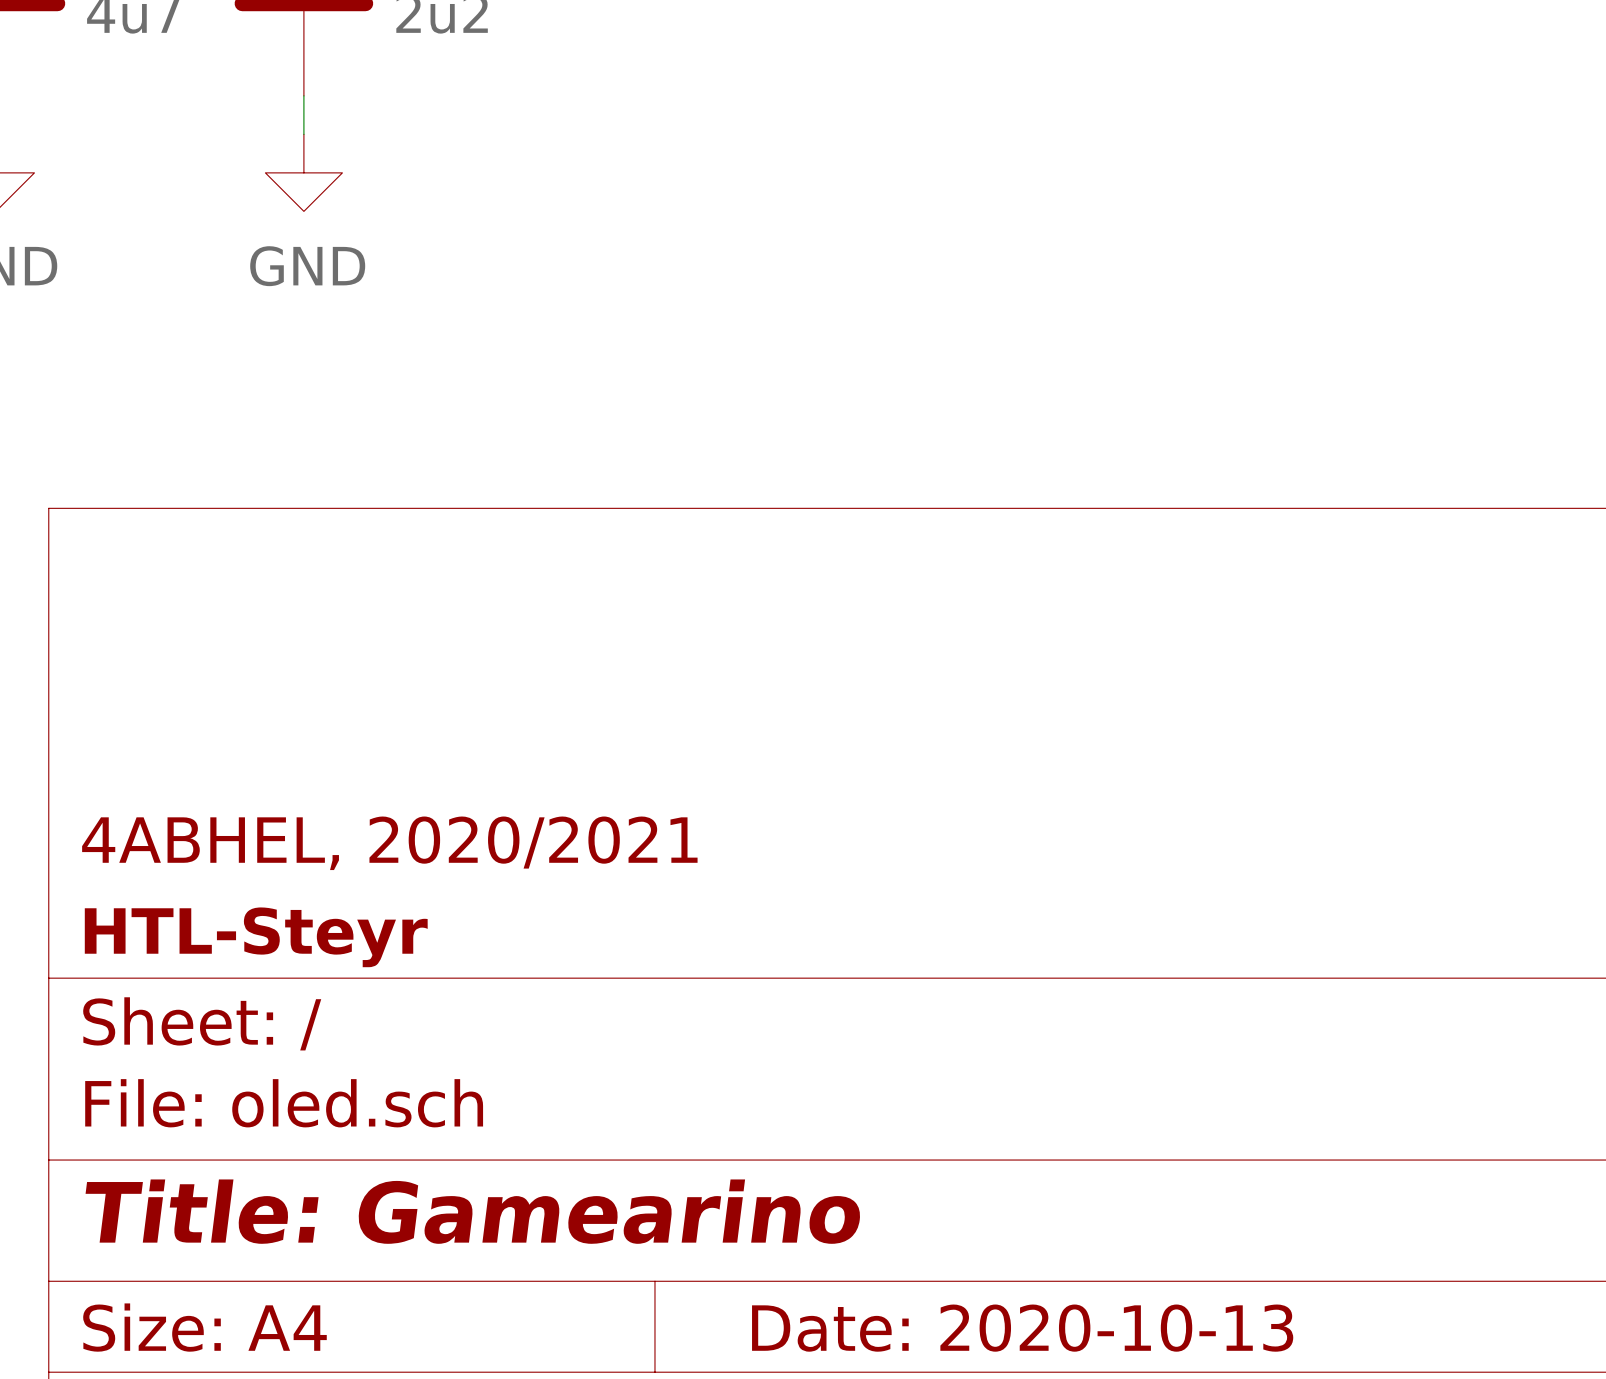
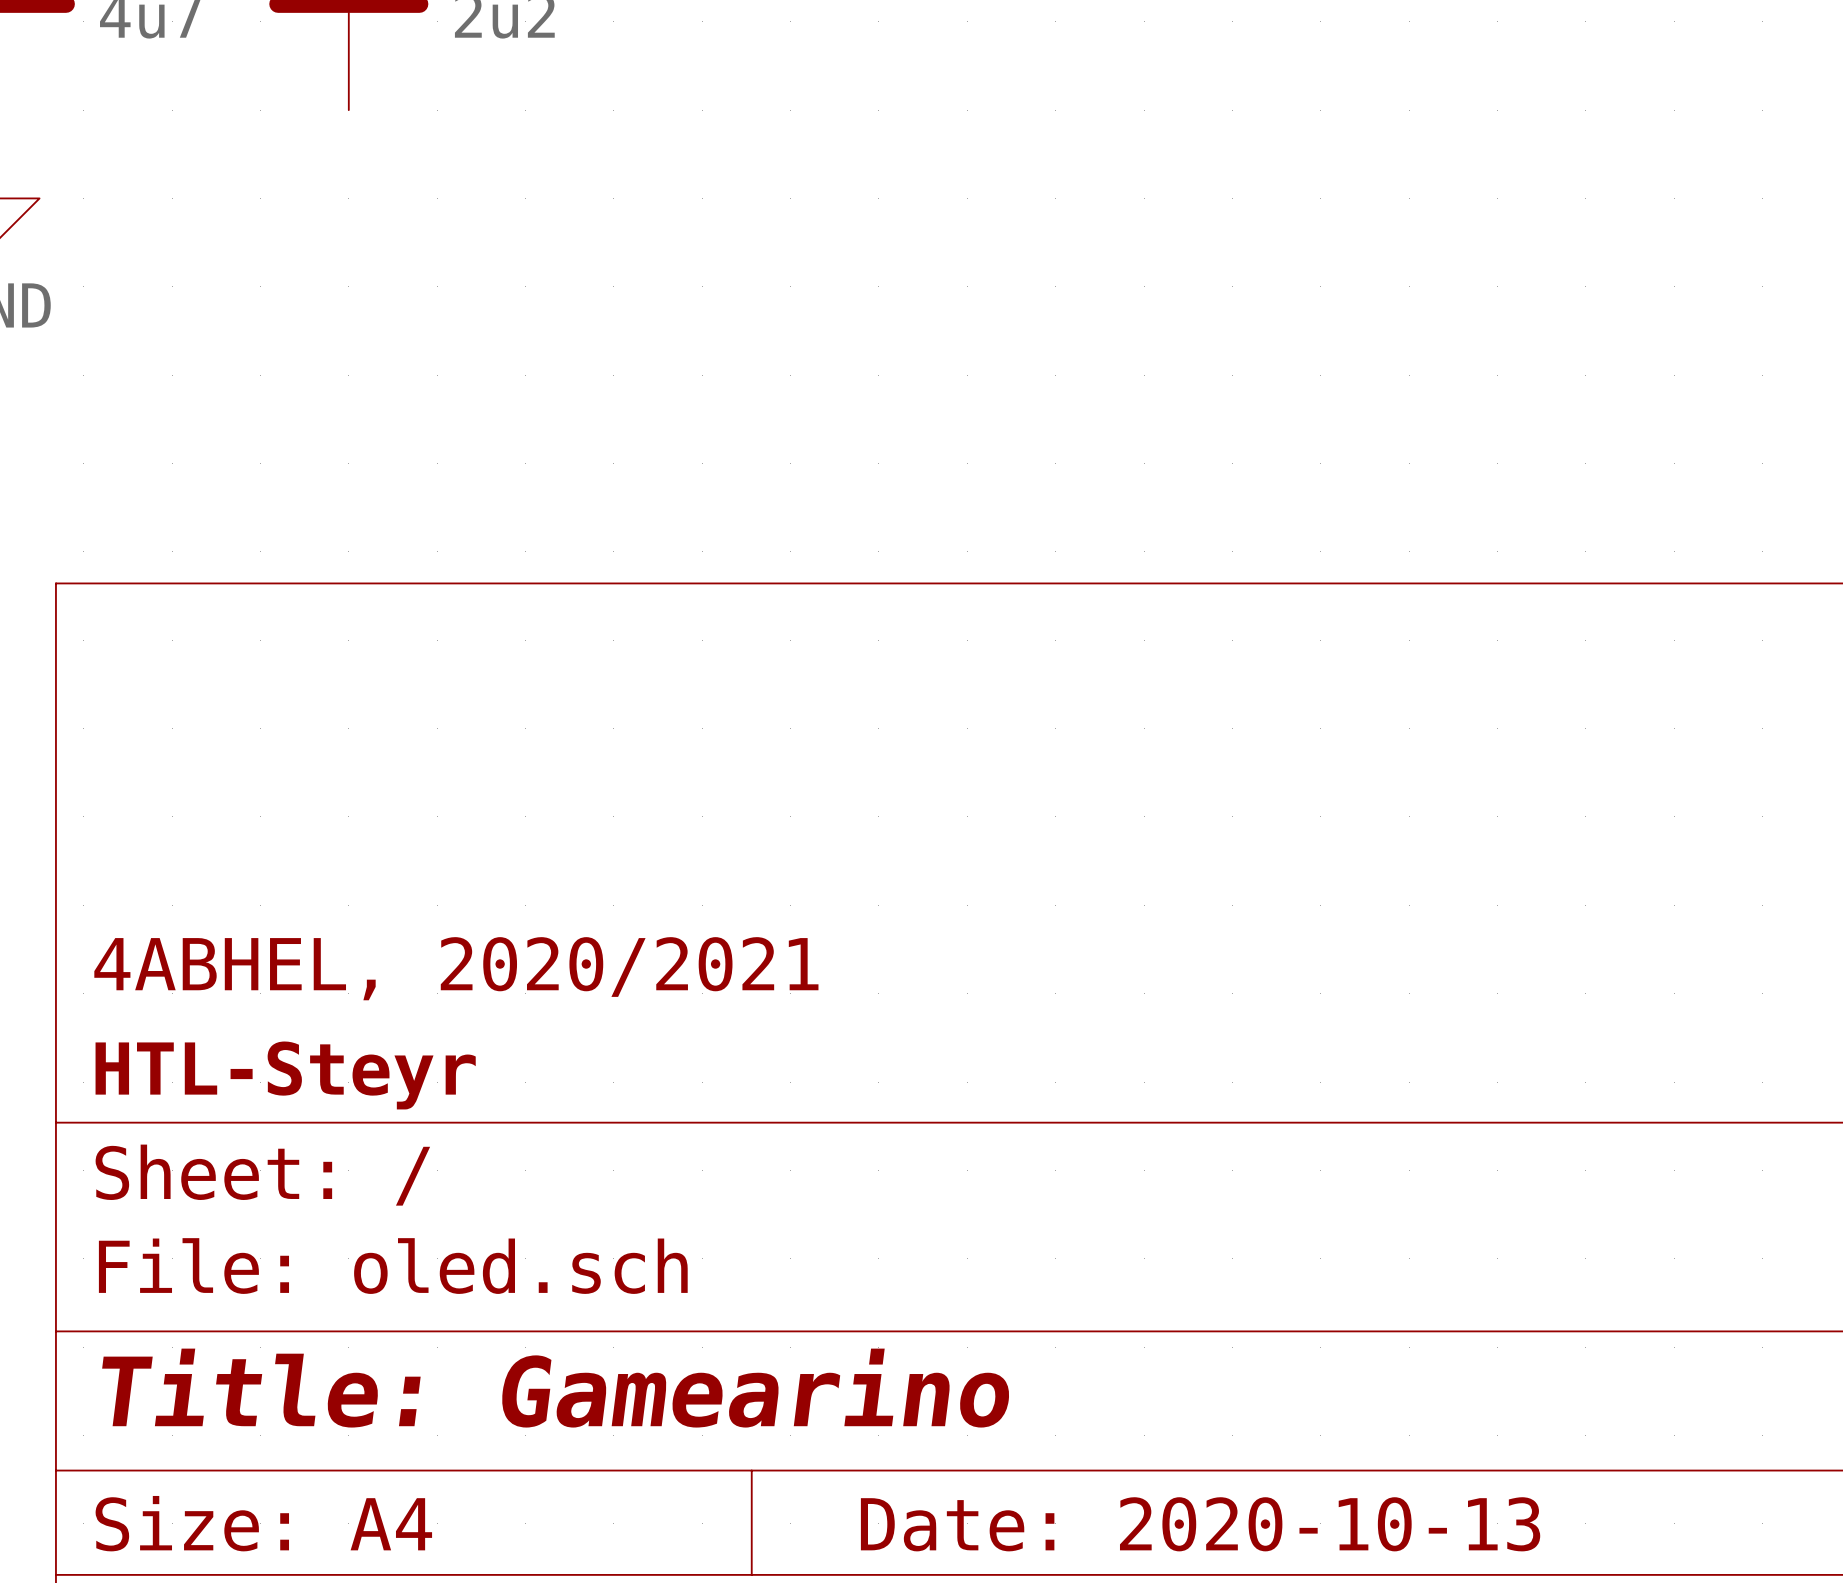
wire: (303, 95) (303, 134) -> none
power symbol: GND (303, 172) -> none

